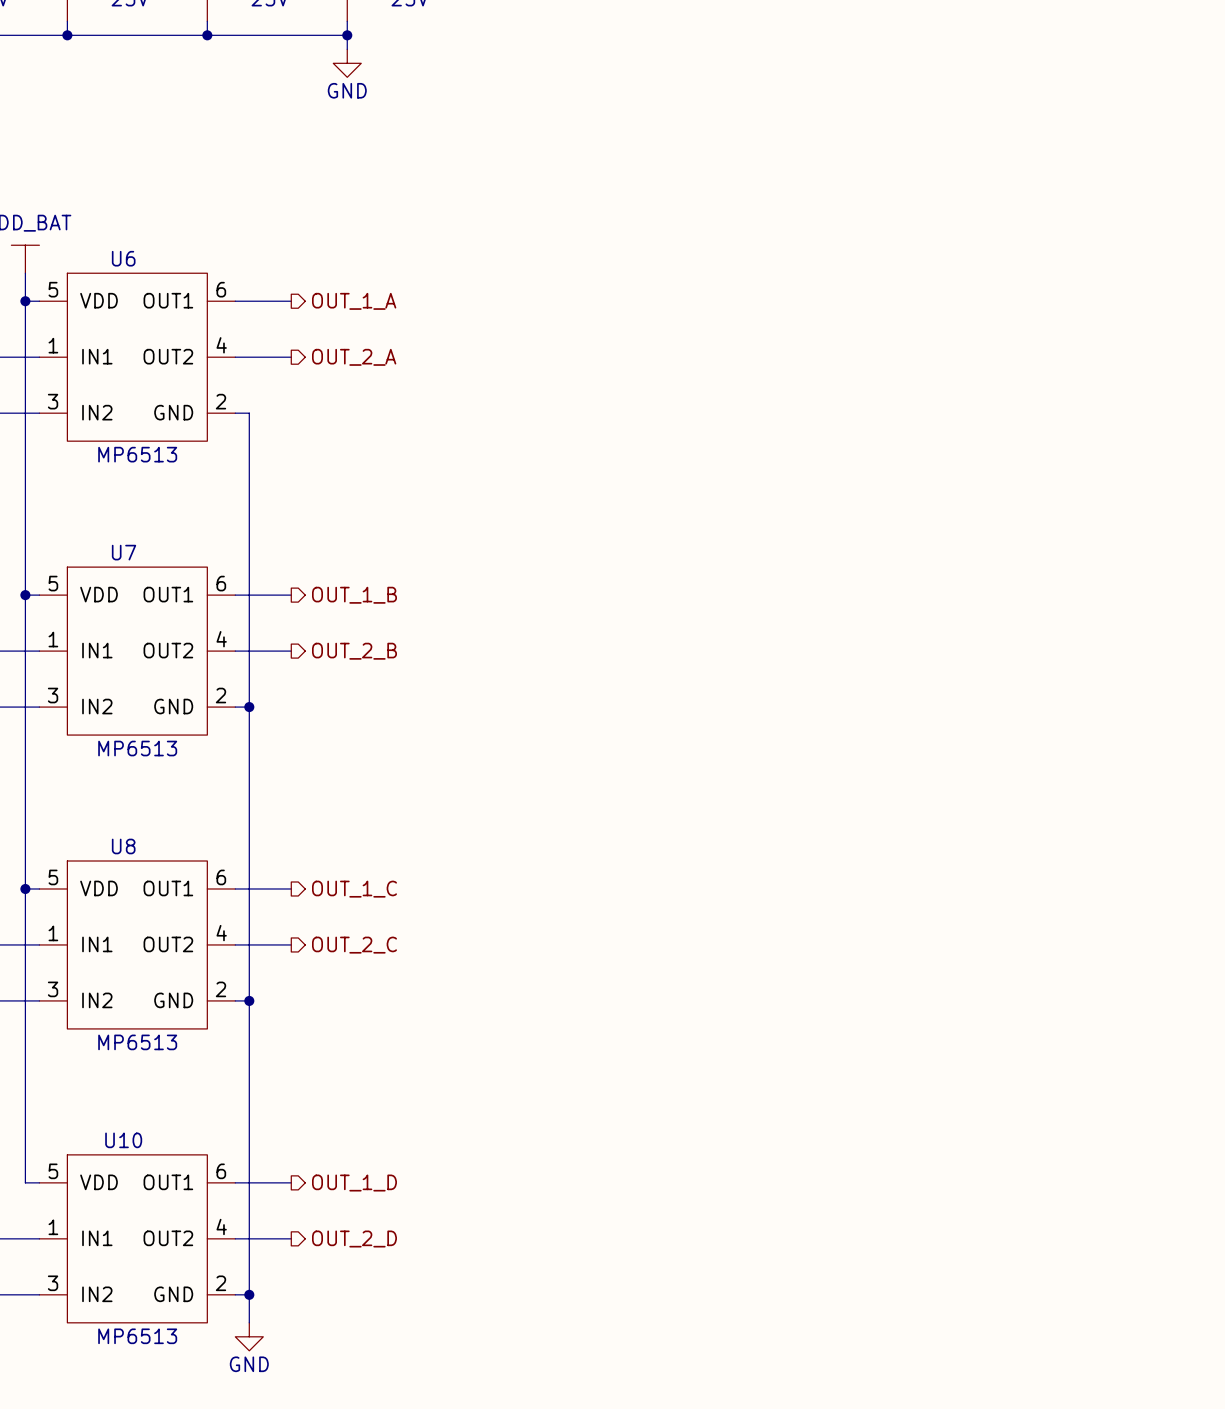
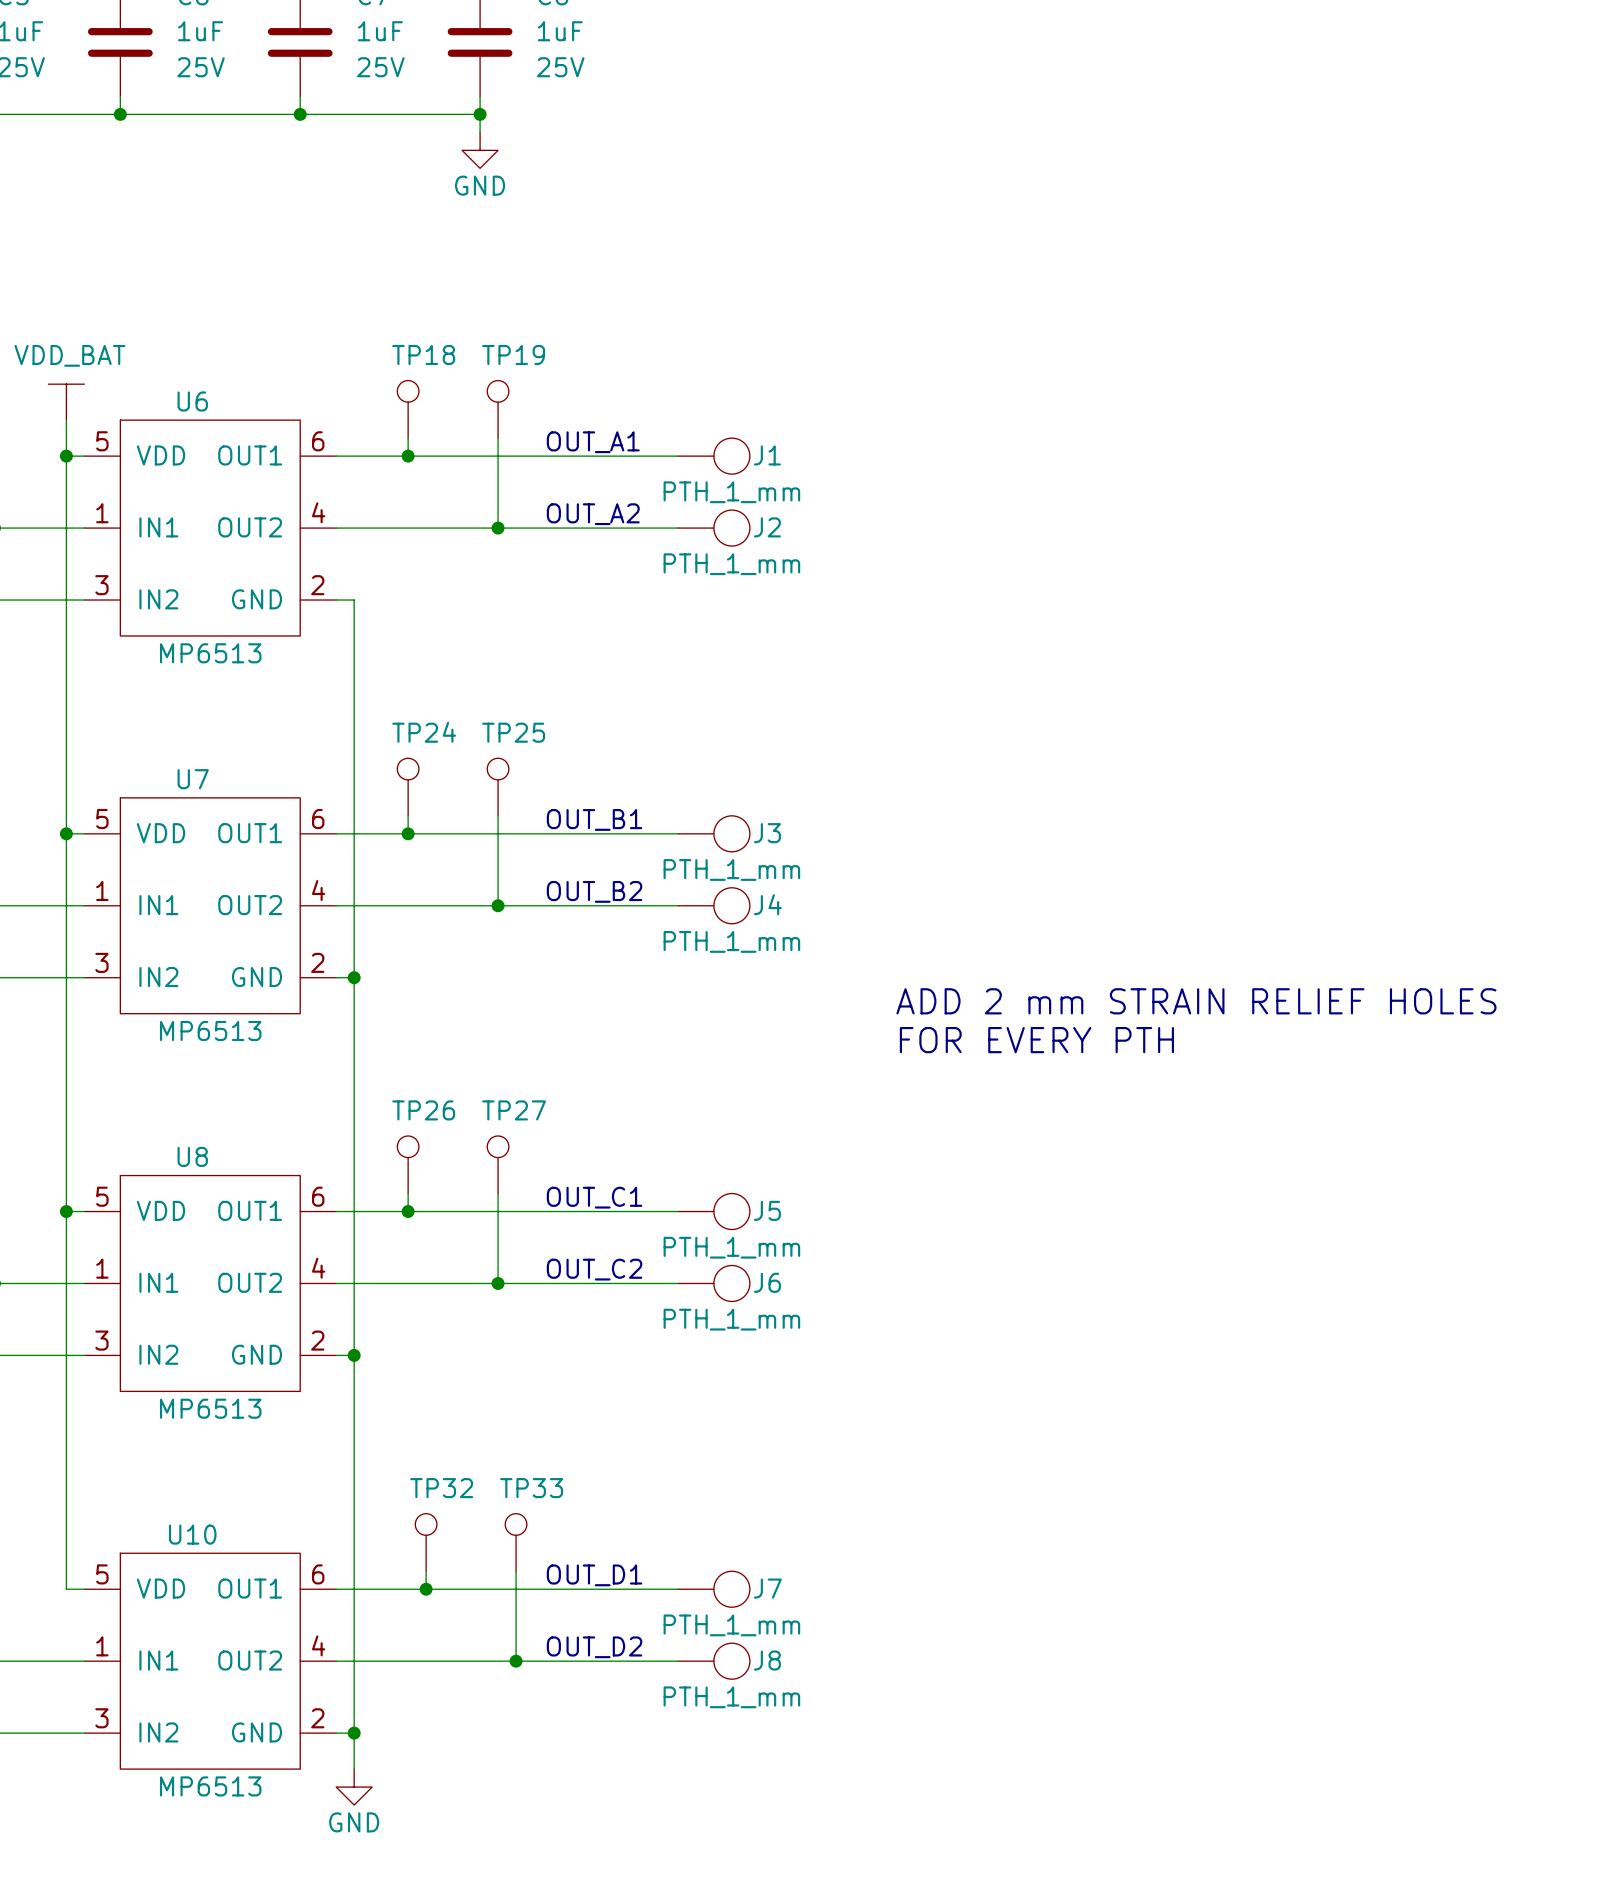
TP18: none -> (408, 409)
TP19: none -> (498, 409)
wire: none -> (408, 438) (408, 456) (677, 456)
wire: none -> (498, 438) (498, 528)
text: none -> OUT_A1 (593, 442)
junction: none -> (408, 456)
hierarchical label: OUT_1_A (354, 301) -> none
J1: none -> PTH_1_mm (713, 456)
text: none -> OUT_A2 (593, 514)
wire: none -> (408, 528) (677, 528)
hierarchical label: OUT_2_A (354, 357) -> none
junction: none -> (498, 528)
J2: none -> PTH_1_mm (713, 528)
TP24: none -> (408, 787)
TP25: none -> (498, 787)
wire: none -> (408, 815) (408, 833) (677, 833)
wire: none -> (498, 815) (498, 905)
text: none -> OUT_B1 (594, 819)
junction: none -> (408, 833)
hierarchical label: OUT_1_B (354, 595) -> none
J3: none -> PTH_1_mm (713, 833)
text: none -> OUT_B2 (594, 891)
wire: none -> (408, 905) (677, 905)
hierarchical label: OUT_2_B (354, 651) -> none
junction: none -> (498, 905)
J4: none -> PTH_1_mm (713, 905)
text: none -> ADD 2 mm STRAIN RELIEF HOLES (1196, 1001)
text: none -> FOR EVERY PTH (1036, 1040)
TP26: none -> (408, 1164)
TP27: none -> (498, 1164)
wire: none -> (408, 1193) (408, 1211) (677, 1211)
wire: none -> (498, 1193) (498, 1283)
text: none -> OUT_C1 (594, 1197)
junction: none -> (408, 1211)
J5: none -> PTH_1_mm (713, 1211)
hierarchical label: OUT_1_C (354, 889) -> none
text: none -> OUT_C2 (594, 1269)
wire: none -> (408, 1283) (677, 1283)
junction: none -> (498, 1283)
J6: none -> PTH_1_mm (713, 1283)
hierarchical label: OUT_2_C (354, 945) -> none
TP32: none -> (426, 1542)
TP33: none -> (516, 1542)
wire: none -> (426, 1571) (426, 1589)
wire: none -> (516, 1571) (516, 1661)
text: none -> OUT_D1 (594, 1575)
wire: none -> (408, 1589) (677, 1589)
junction: none -> (426, 1589)
J7: none -> PTH_1_mm (713, 1589)
hierarchical label: OUT_1_D (354, 1183) -> none
text: none -> OUT_D2 (594, 1647)
wire: none -> (408, 1661) (677, 1661)
junction: none -> (516, 1661)
J8: none -> PTH_1_mm (713, 1661)
hierarchical label: OUT_2_D (354, 1239) -> none

